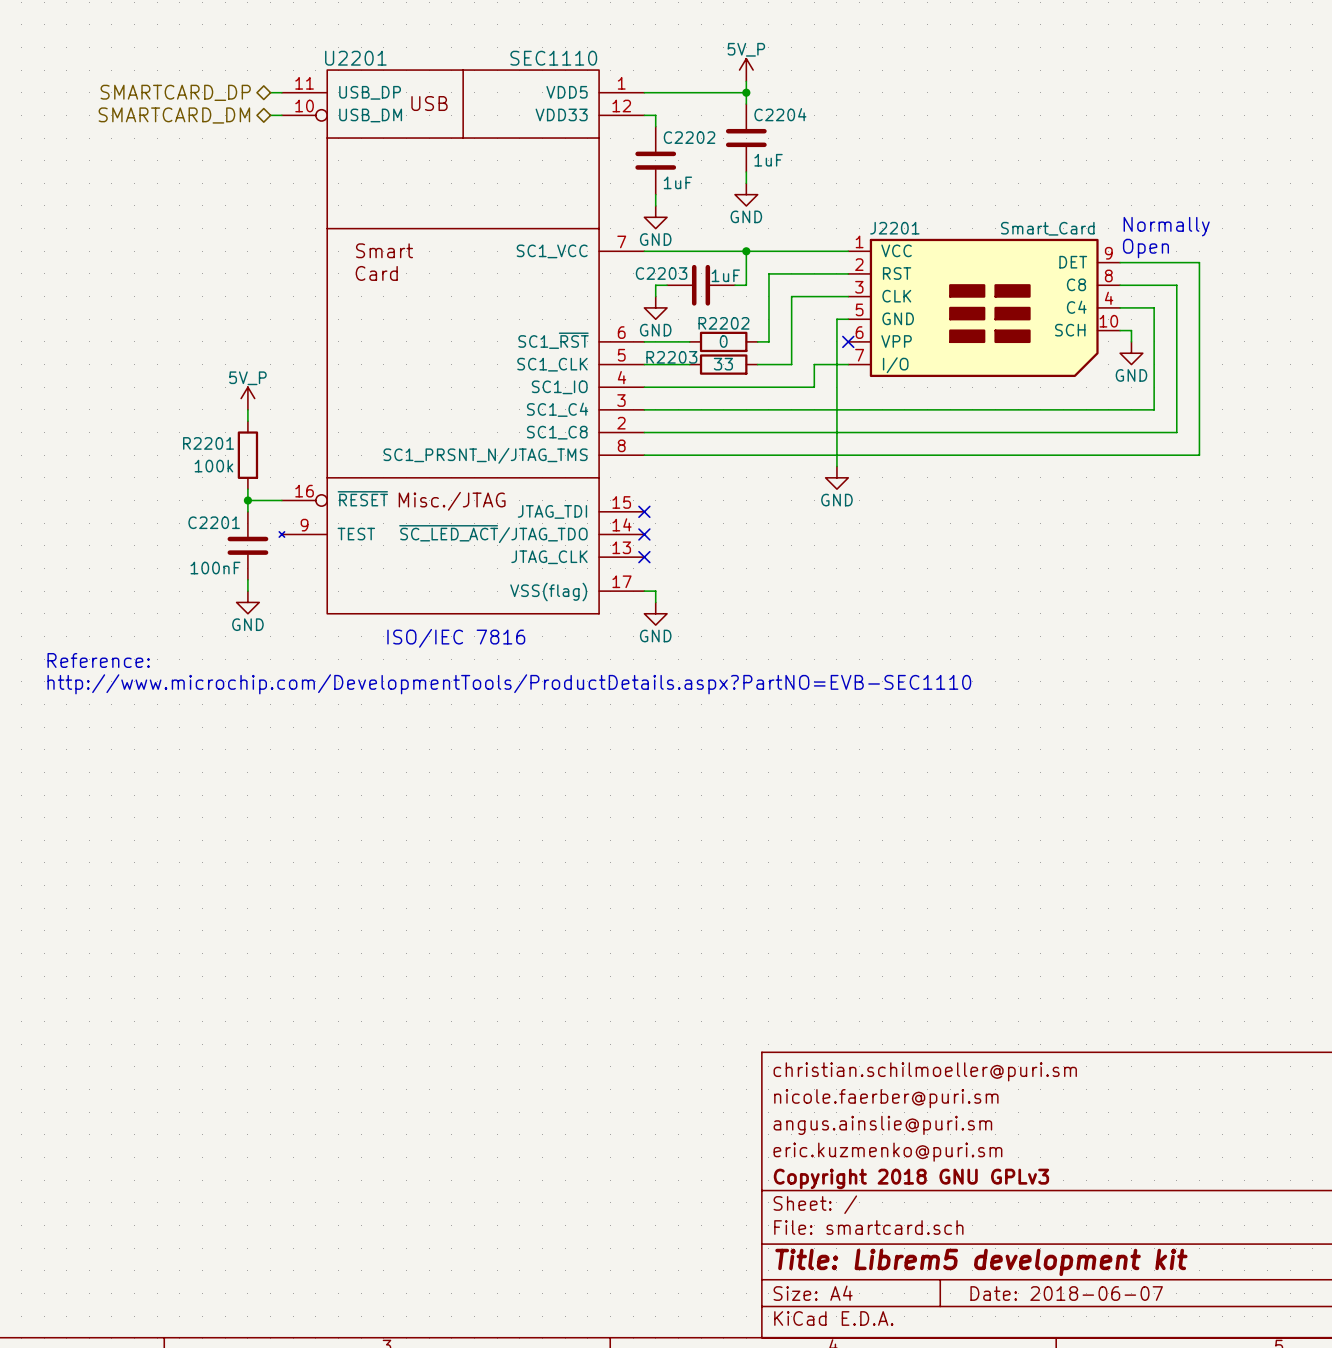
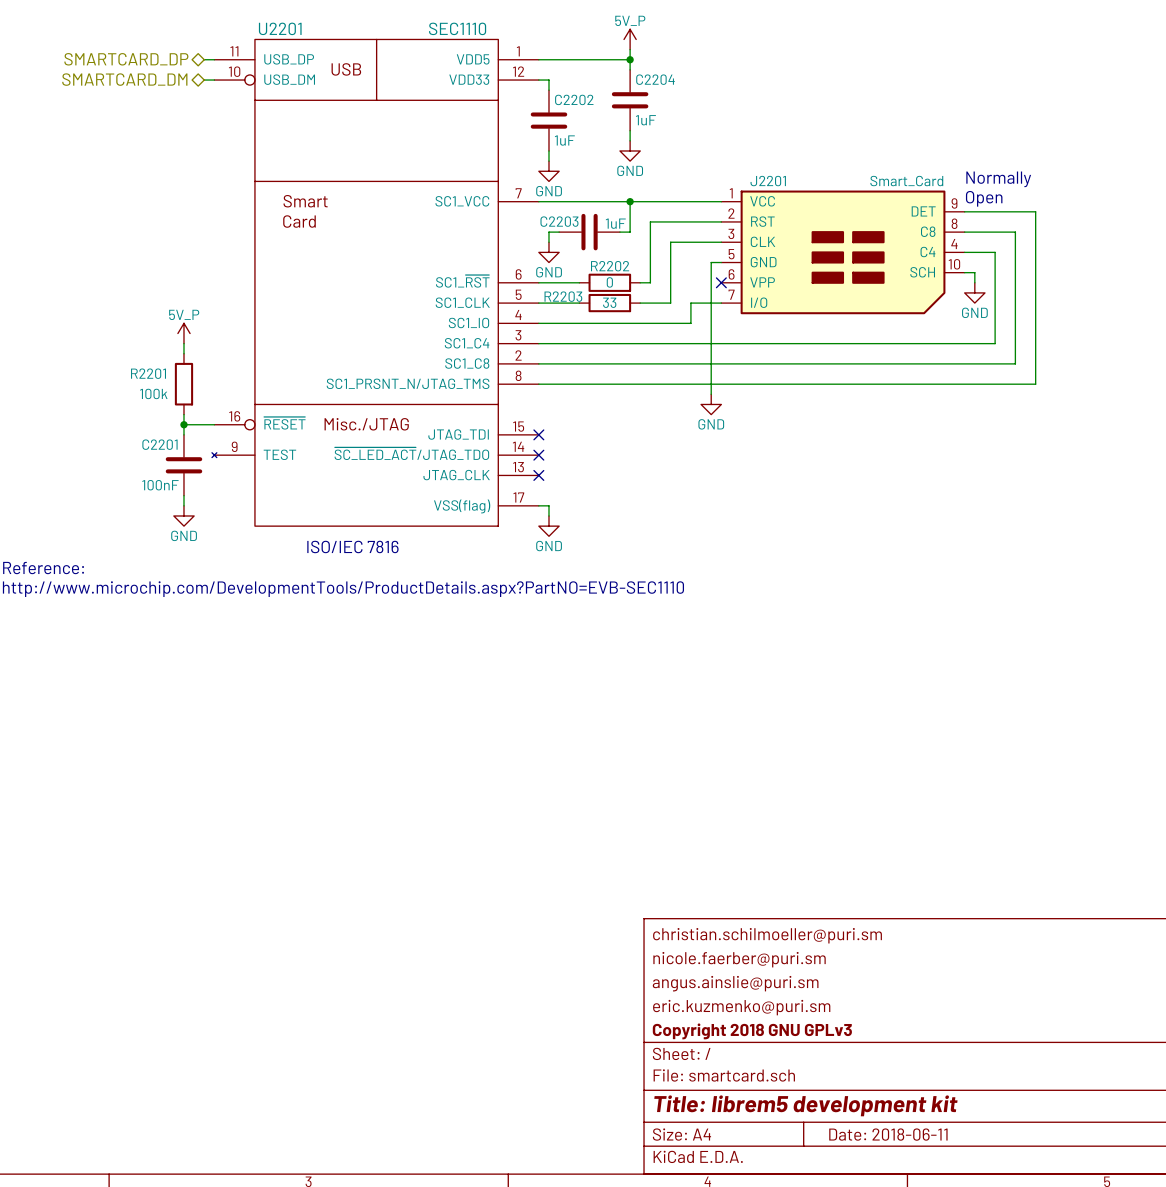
title block: Title: Librem5 development kit (981, 1262) -> Title: librem5 development kit (805, 1105)
title block: Date: 2018-06-07 (1066, 1293) -> Date: 2018-06-11 (888, 1134)

